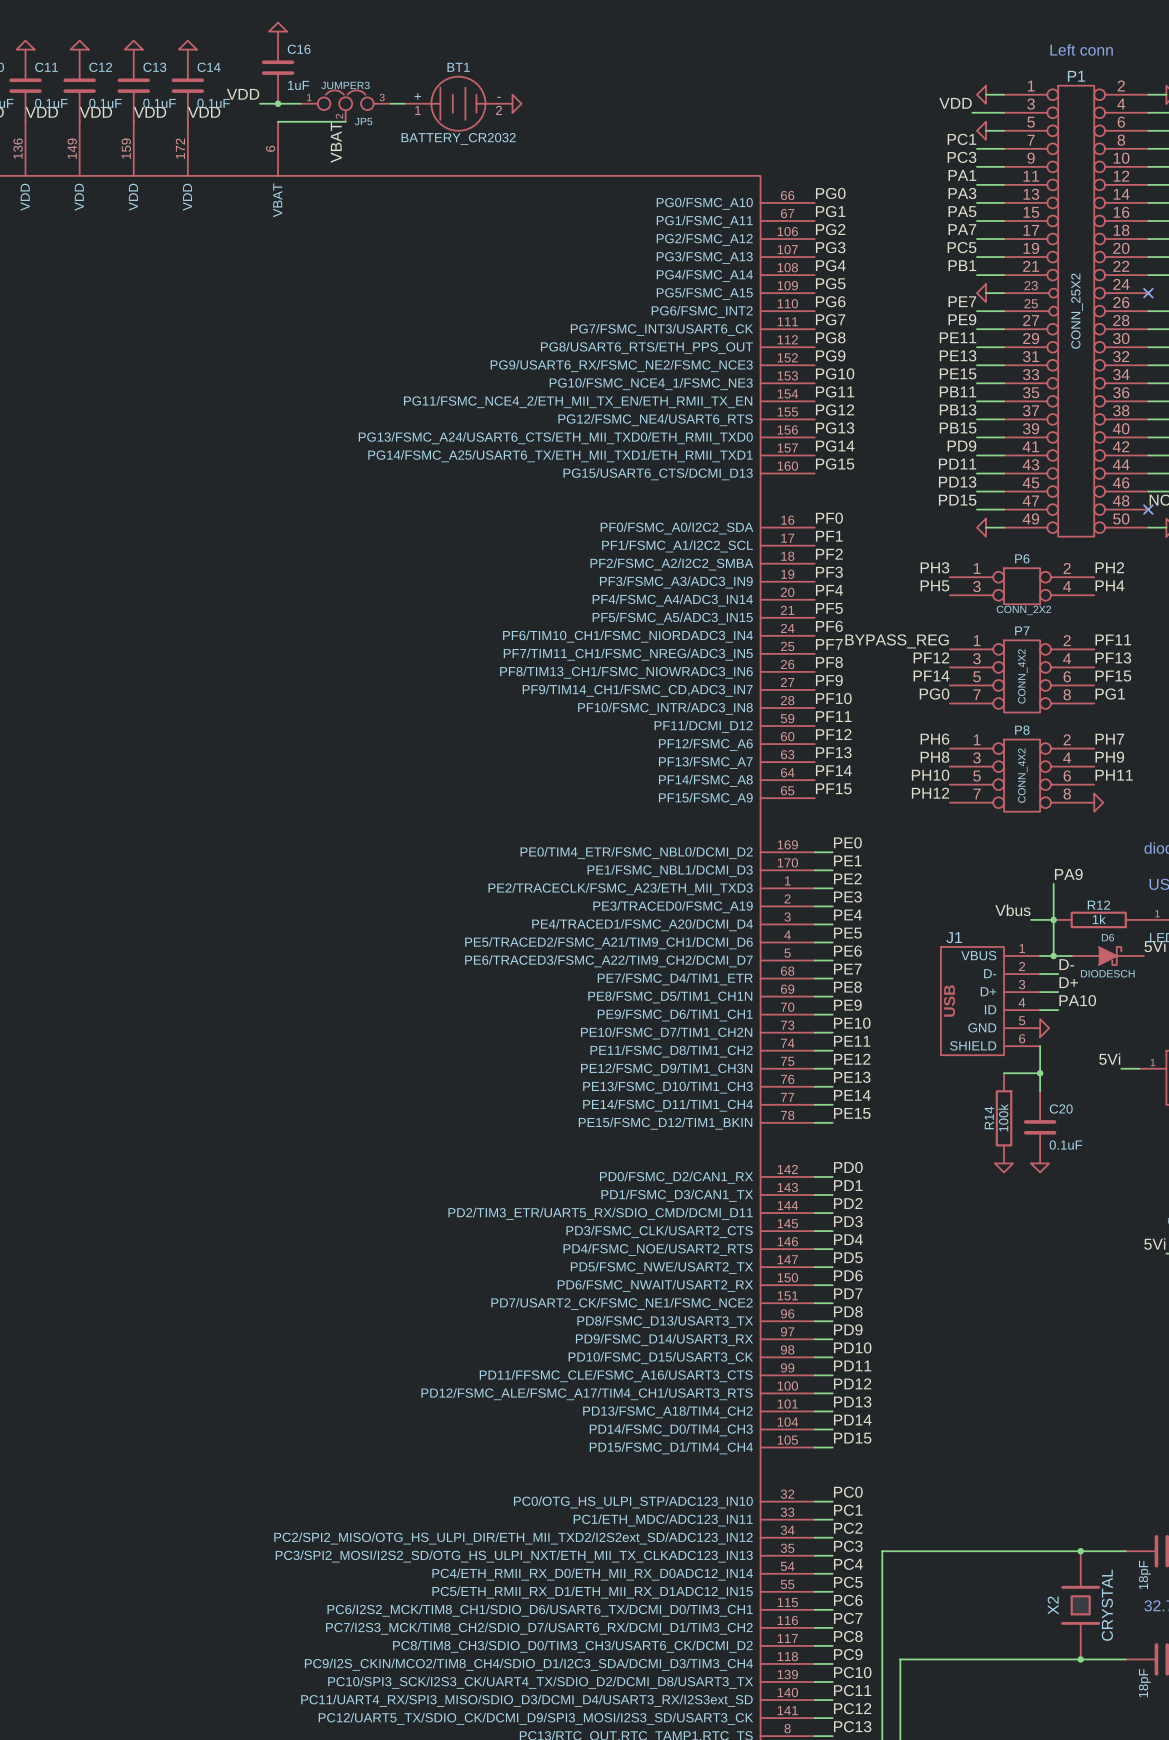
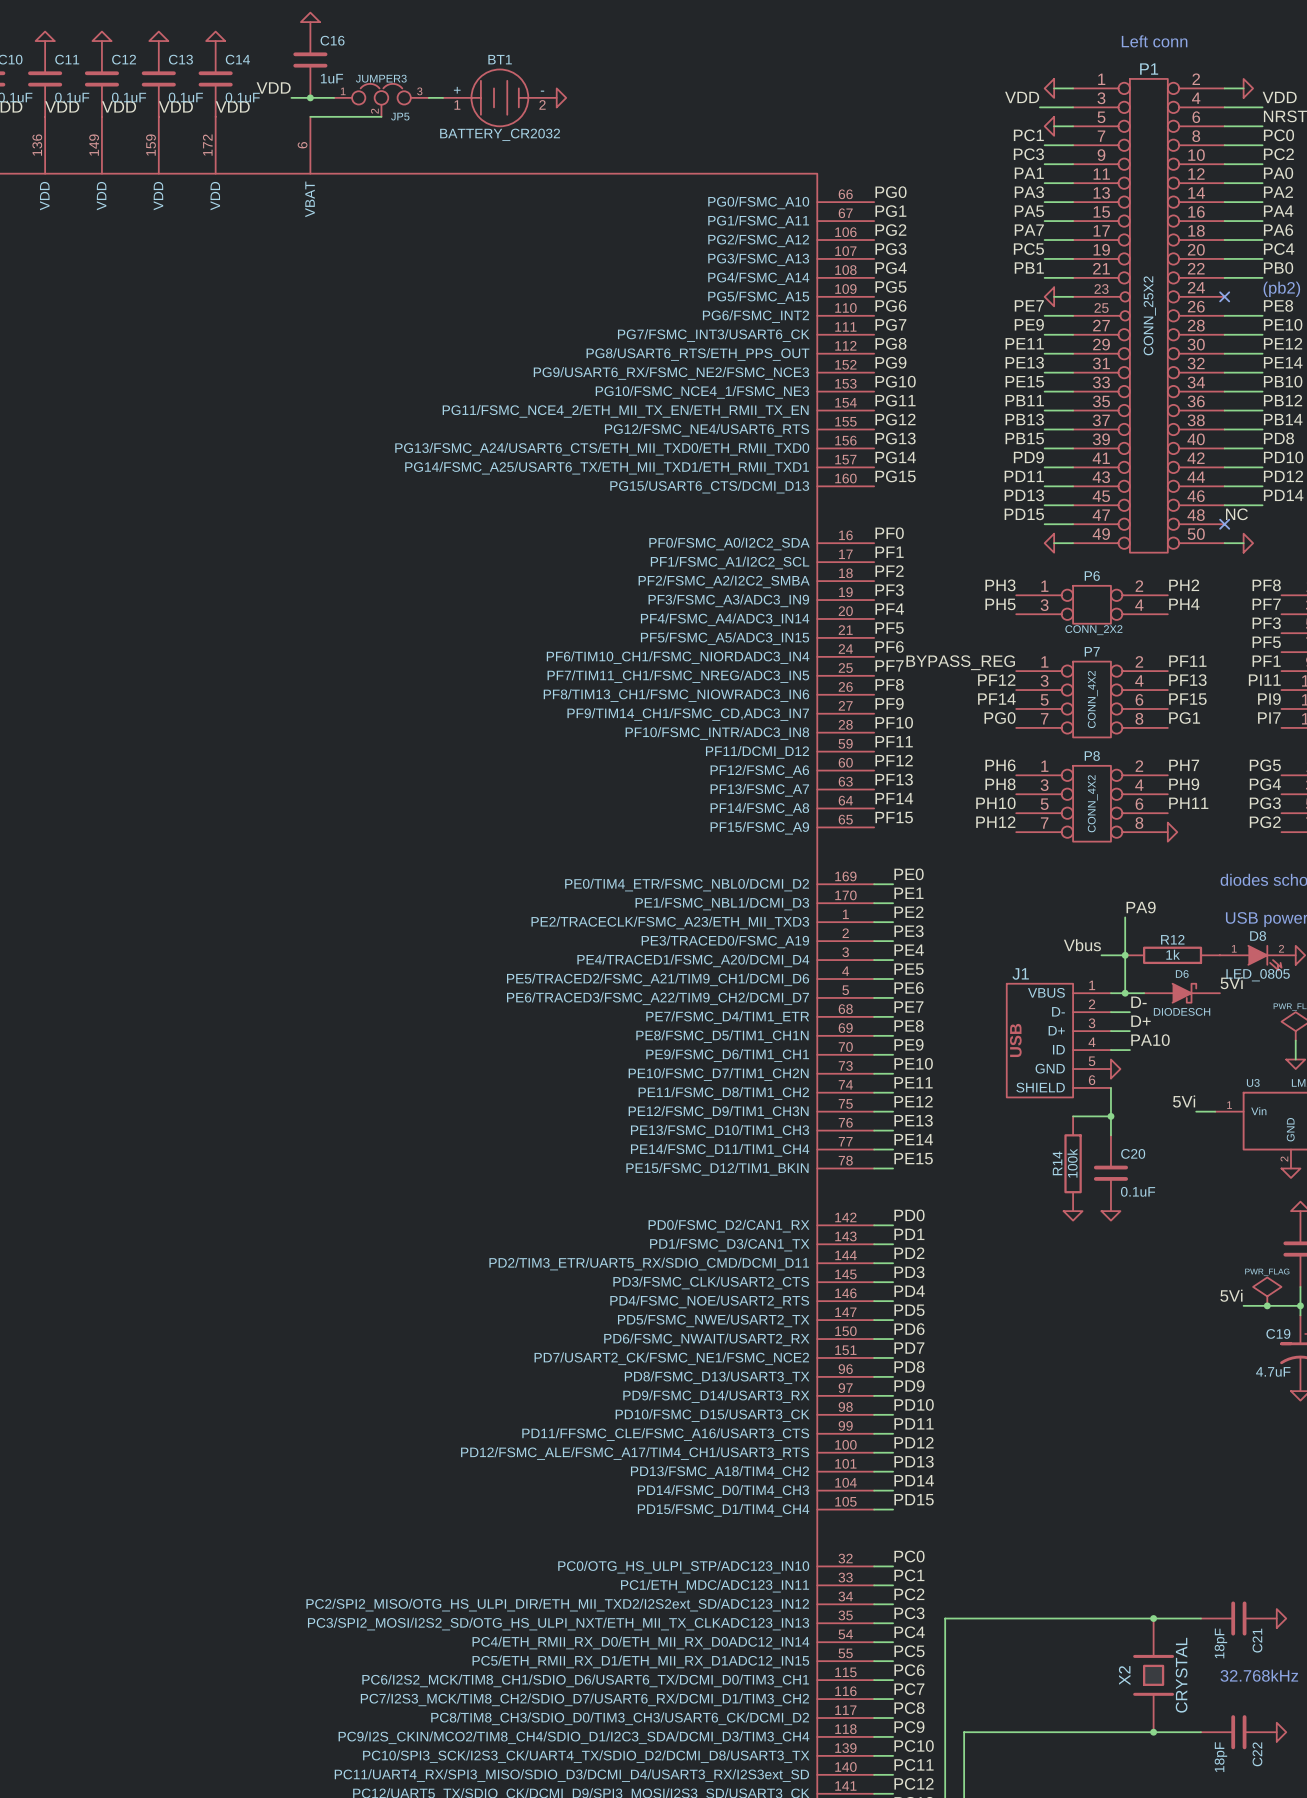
label: VBAT (336, 142) -> none

